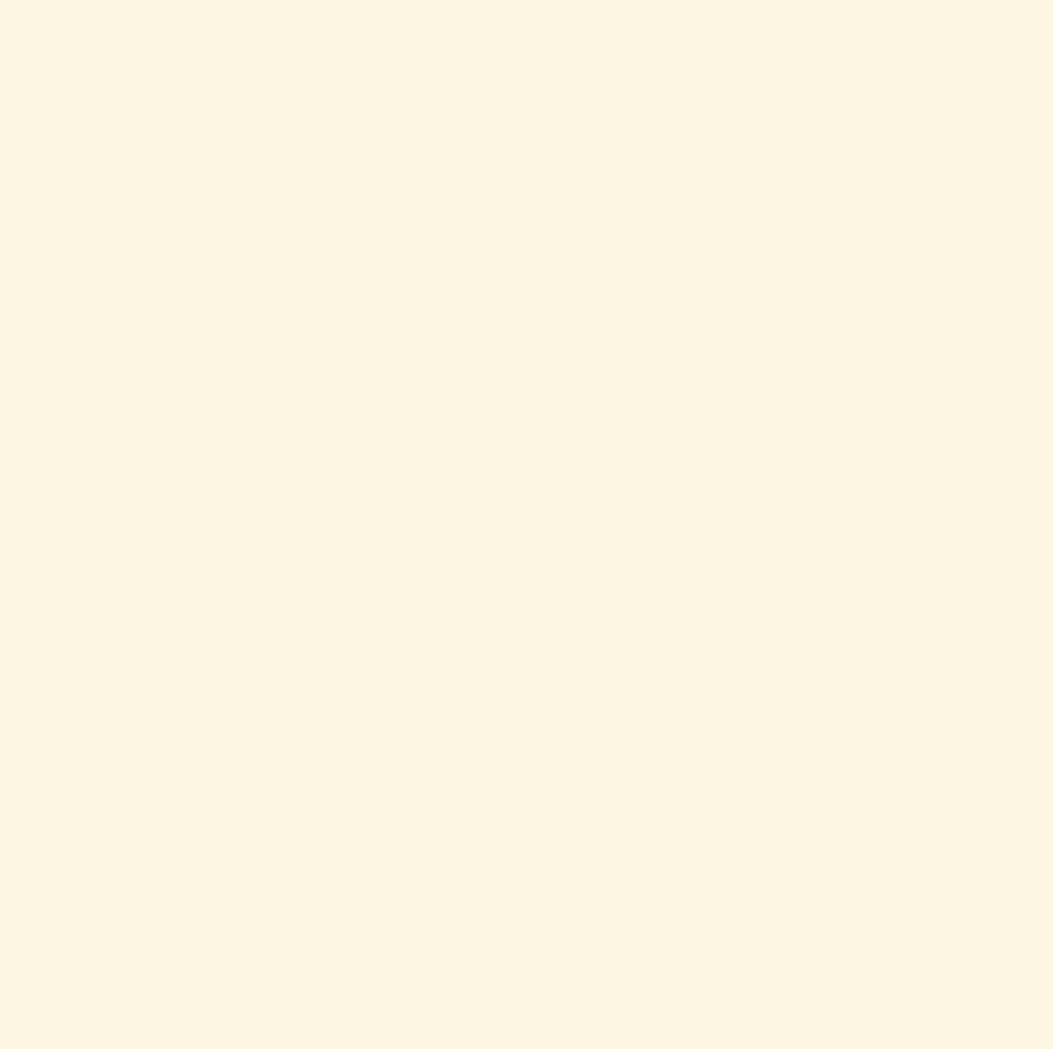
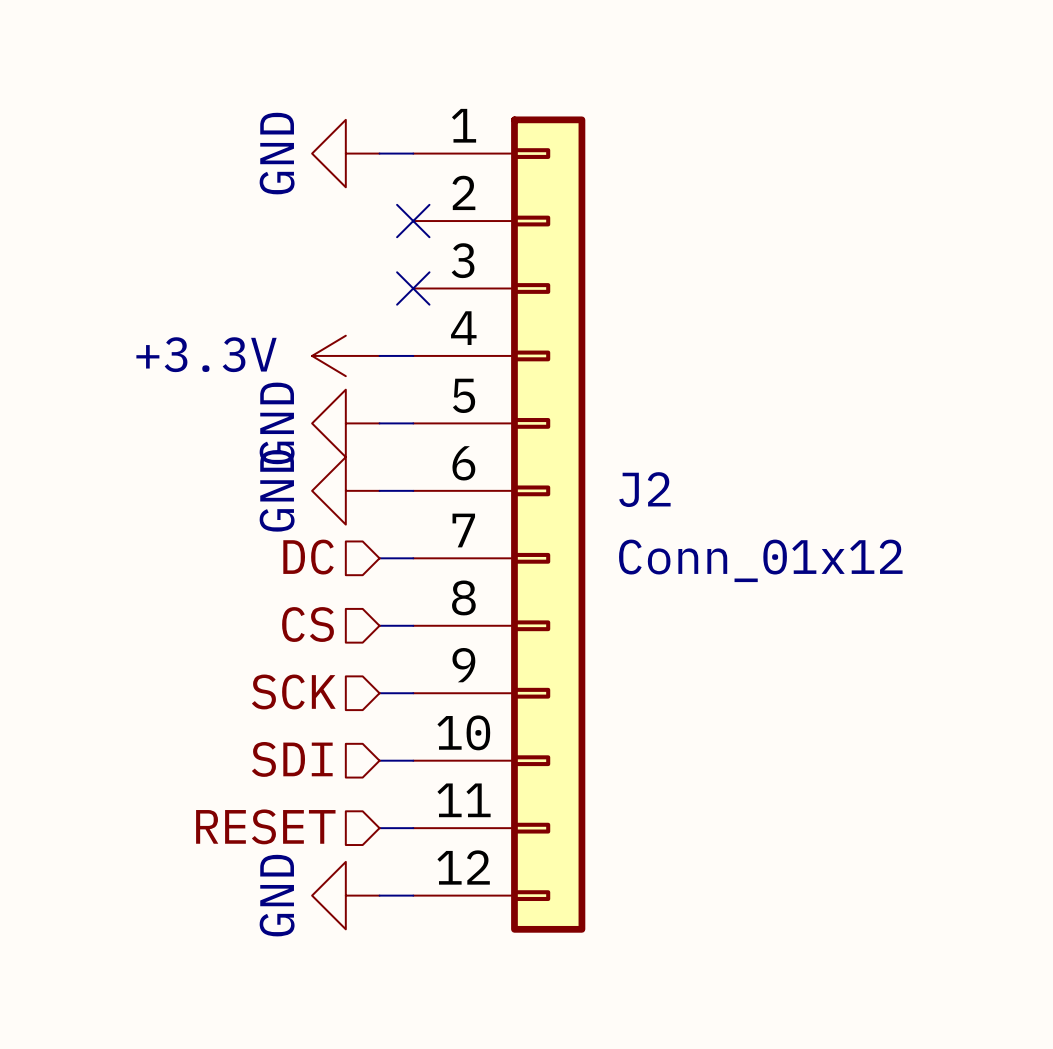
power symbol: none -> GND (345, 153)
wire: none -> (379, 153) (413, 153)
no-connect mark: none -> (413, 221)
no-connect mark: none -> (413, 288)
power symbol: none -> +3.3V (345, 355)
wire: none -> (379, 355) (413, 355)
power symbol: none -> GND (345, 423)
wire: none -> (379, 423) (413, 423)
power symbol: none -> GND (345, 490)
wire: none -> (379, 490) (413, 490)
J2: none -> Conn_01x12 (499, 524)
hierarchical label: none -> DC (308, 557)
wire: none -> (379, 558) (413, 558)
hierarchical label: none -> CS (308, 624)
wire: none -> (379, 625) (413, 625)
hierarchical label: none -> SCK (293, 691)
wire: none -> (379, 693) (413, 693)
hierarchical label: none -> SDI (292, 759)
wire: none -> (379, 760) (413, 760)
hierarchical label: none -> RESET (265, 826)
wire: none -> (379, 828) (413, 828)
power symbol: none -> GND (345, 895)
wire: none -> (379, 895) (413, 895)

